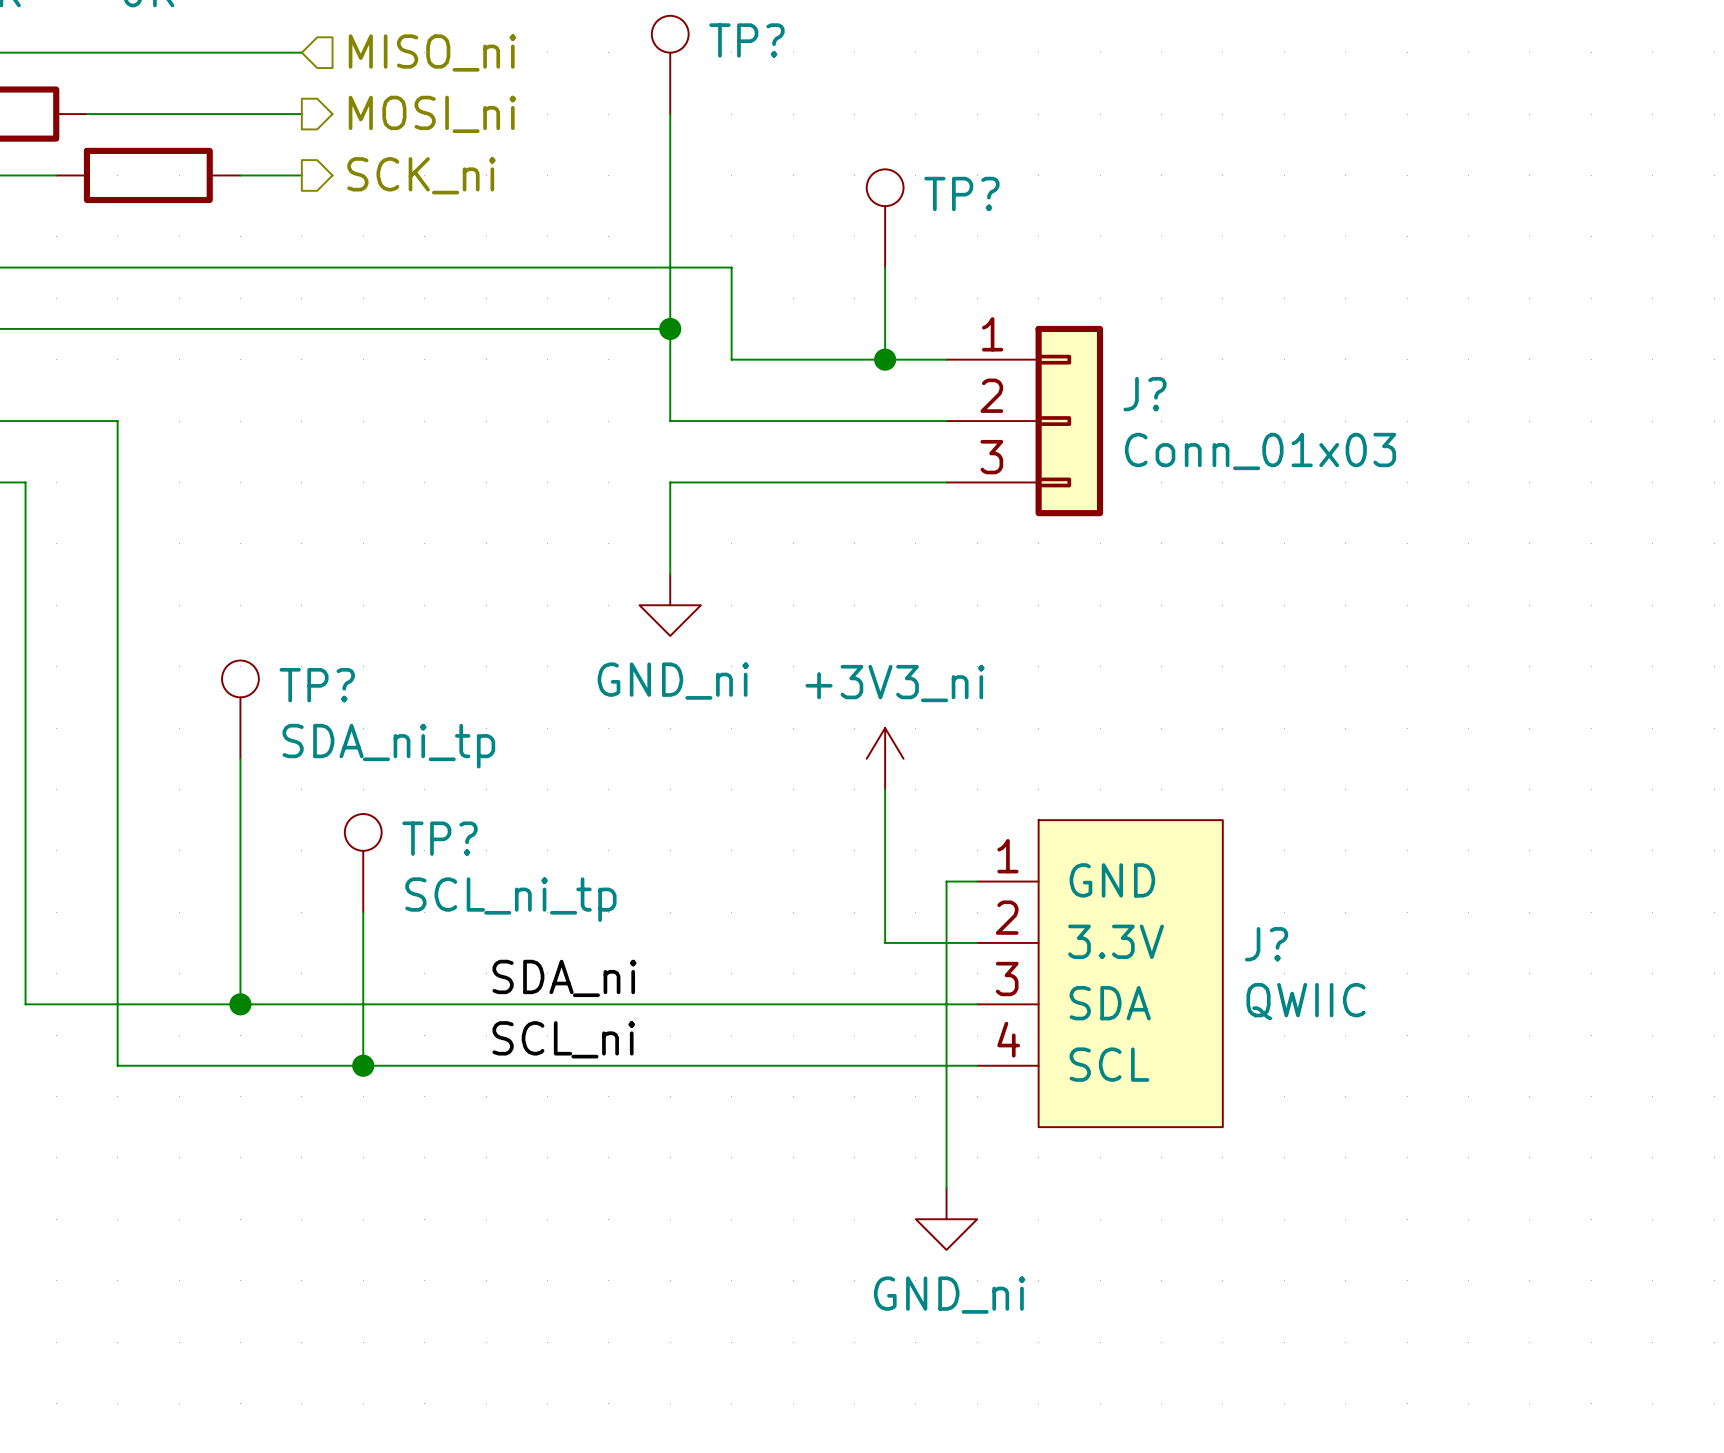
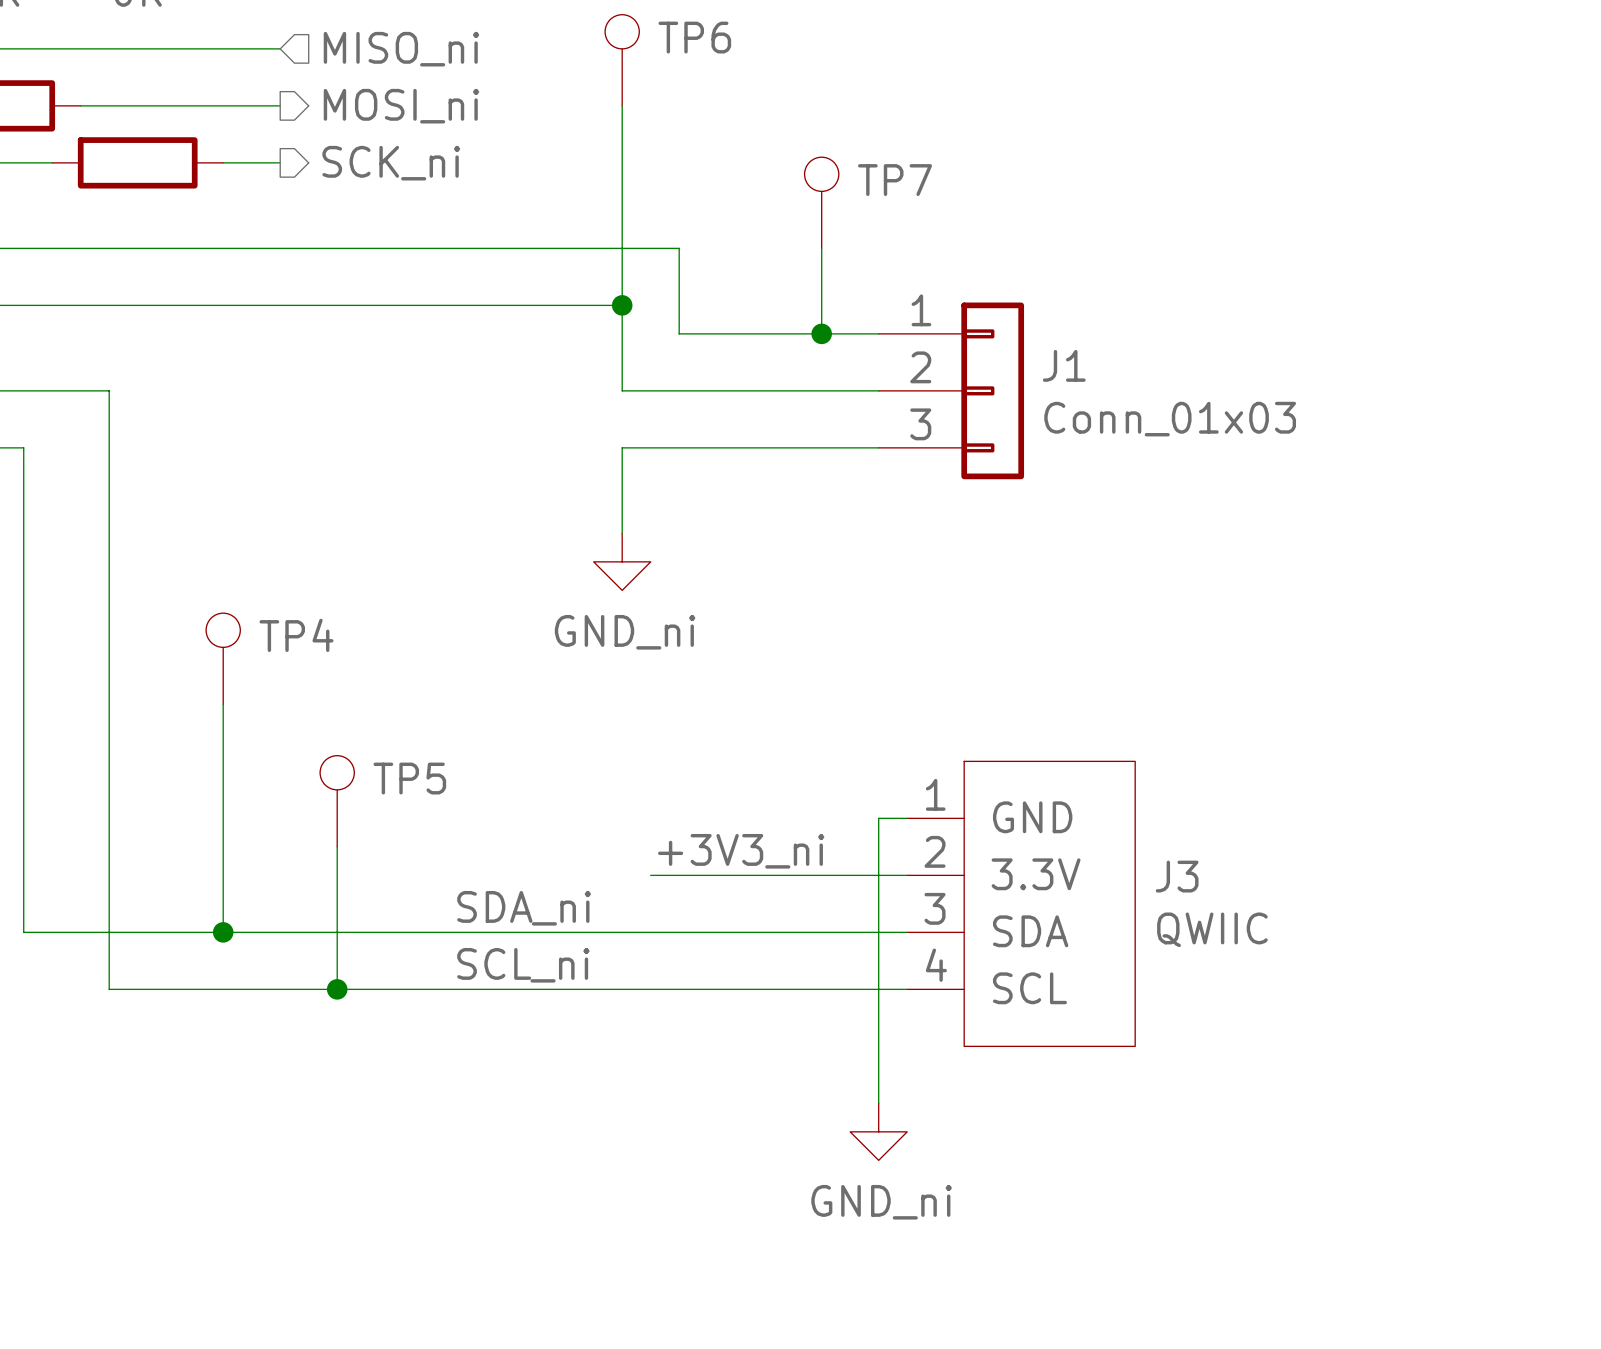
TP? name: TP? (747, 40) -> TP6 (694, 37)
TP? name: TP? (961, 193) -> TP7 (895, 180)
J? name: J? (1144, 394) -> J1 (1064, 365)
TP? name: TP? (317, 685) -> TP4 (296, 635)
TP? value: SDA_ni_tp (388, 746) -> none
power symbol: +3V3_ni (885, 758) -> none
wire: (885, 789) (885, 942) -> (650, 875) (821, 875)
TP? name: TP? (440, 838) -> TP5 (409, 778)
TP? value: SCL_ni_tp (510, 899) -> none
label: none -> +3V3_ni (741, 851)
J? name: J? (1266, 944) -> J3 (1177, 876)

